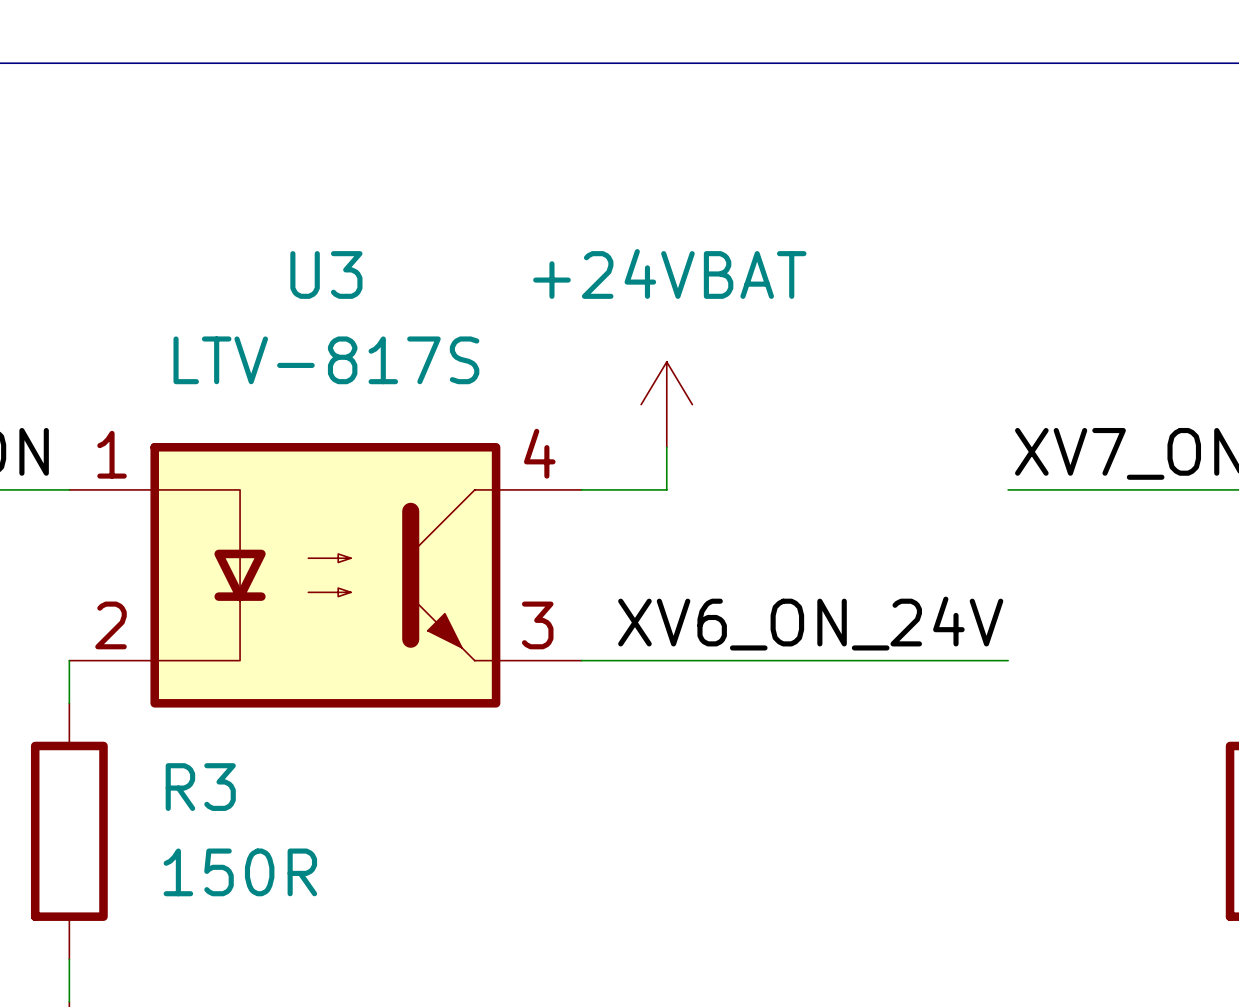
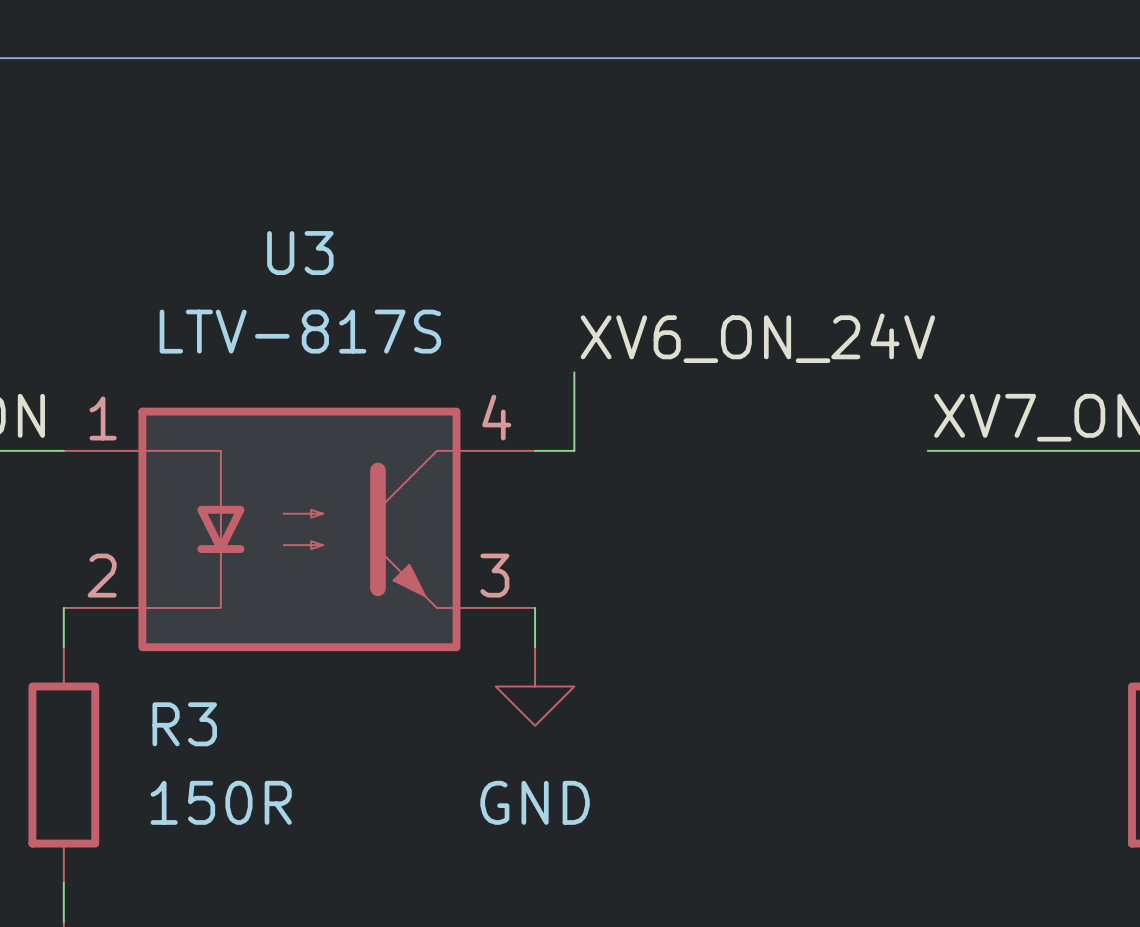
power symbol: +24VBAT (666, 404) -> none
wire: (666, 447) (666, 489) (624, 489) -> (574, 372) (574, 450)
label position: XV6_ON_24V (810, 623) -> XV6_ON_24V (757, 338)
wire: (581, 660) (1008, 660) -> (535, 607) (535, 647)
power symbol: none -> GND (535, 686)

